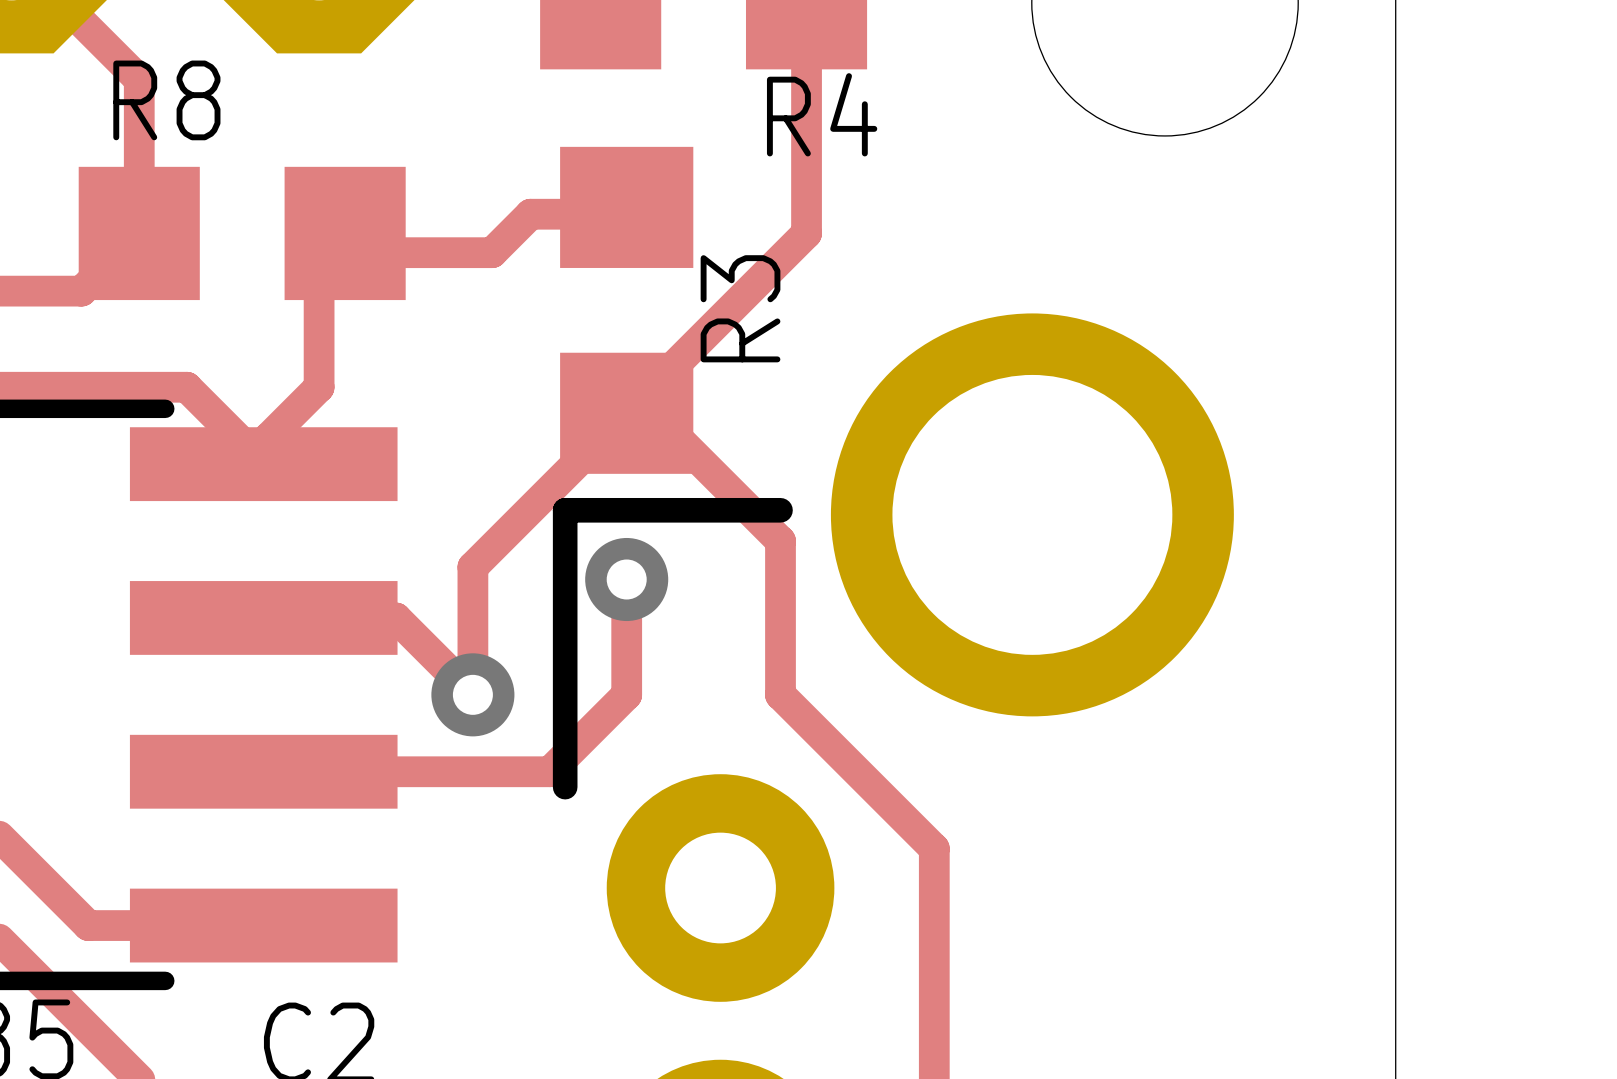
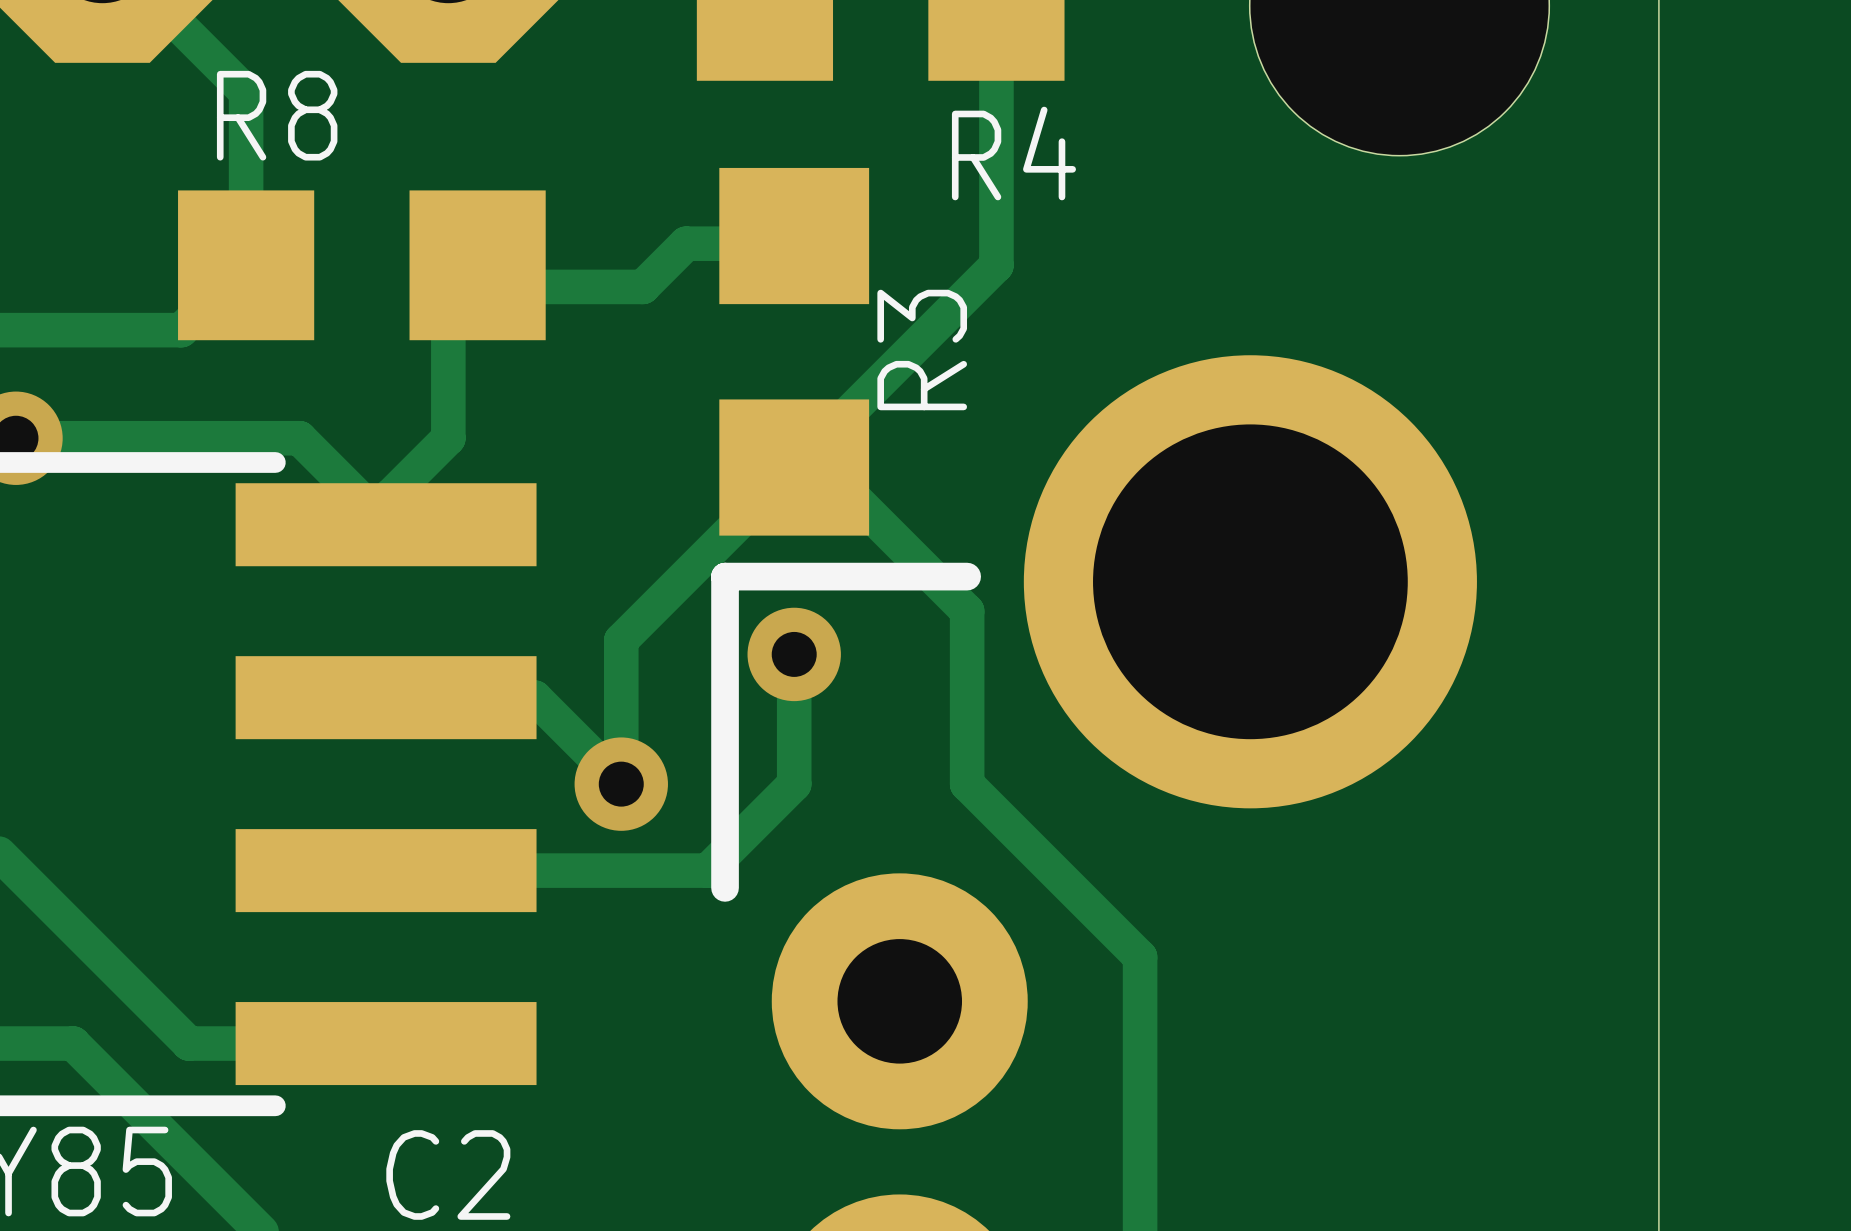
R4 name position: R4 (822, 114) -> R4 (1013, 153)

